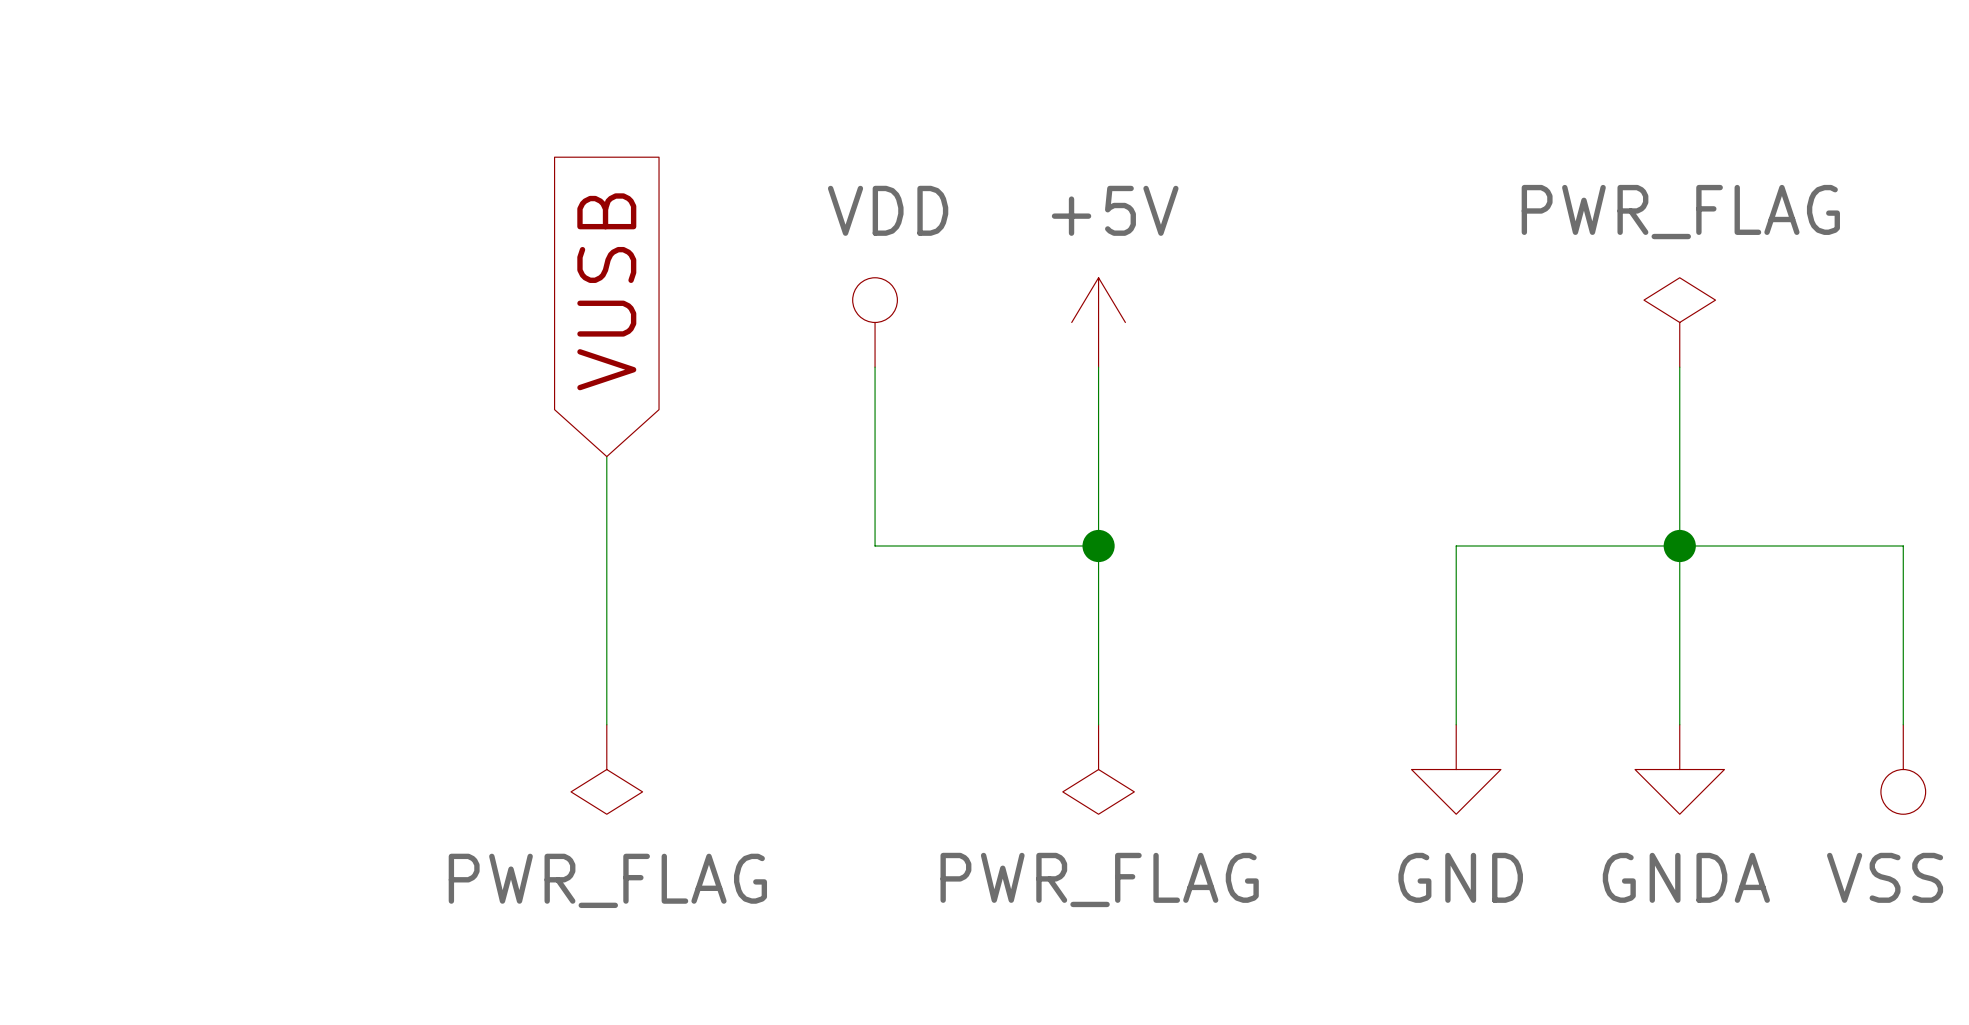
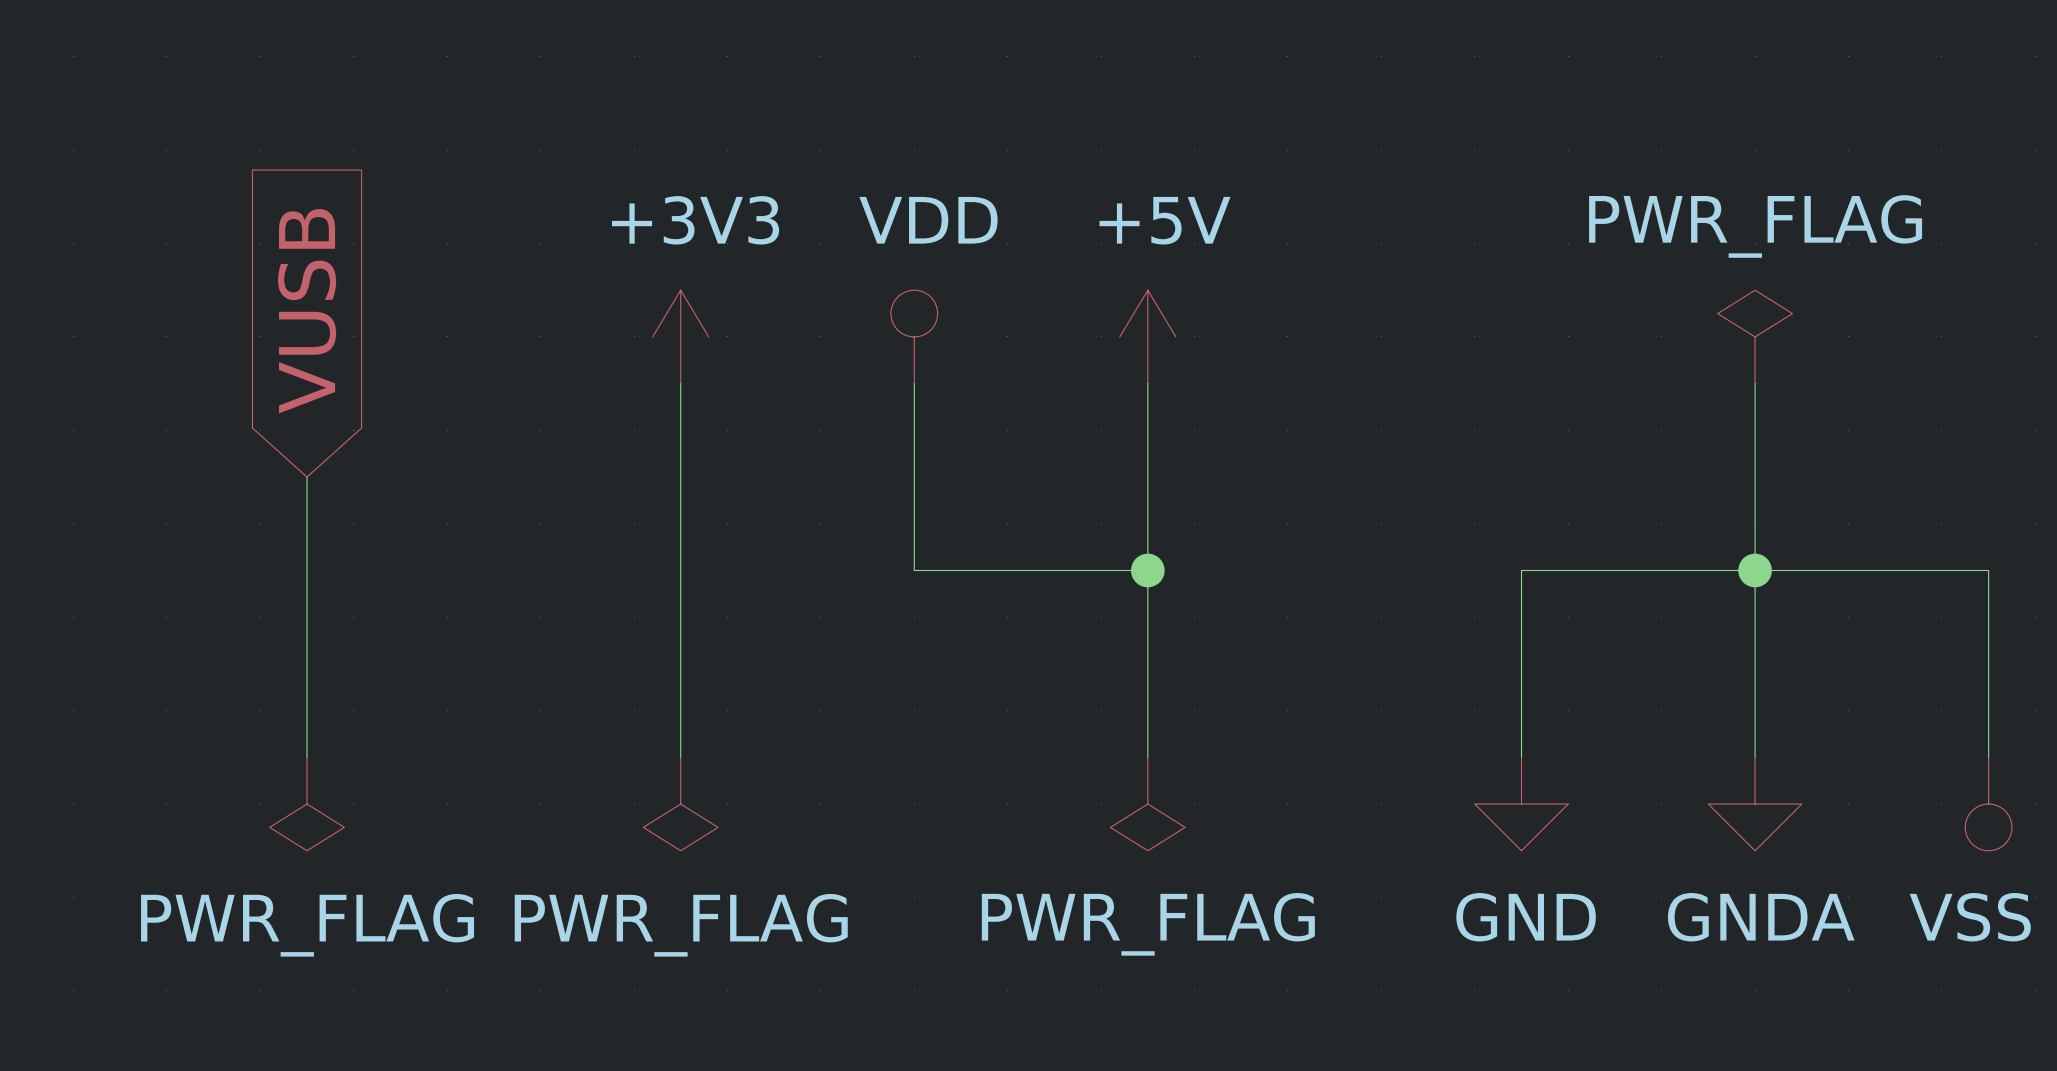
global label position: VUSB (606, 291) -> VUSB (307, 311)
power symbol: none -> +3V3 (680, 336)
wire: none -> (680, 383) (680, 757)
wire: (606, 456) (606, 724) -> (307, 477) (307, 757)
power symbol: none -> PWR_FLAG (307, 804)
power symbol position: PWR_FLAG (606, 769) -> PWR_FLAG (680, 804)

